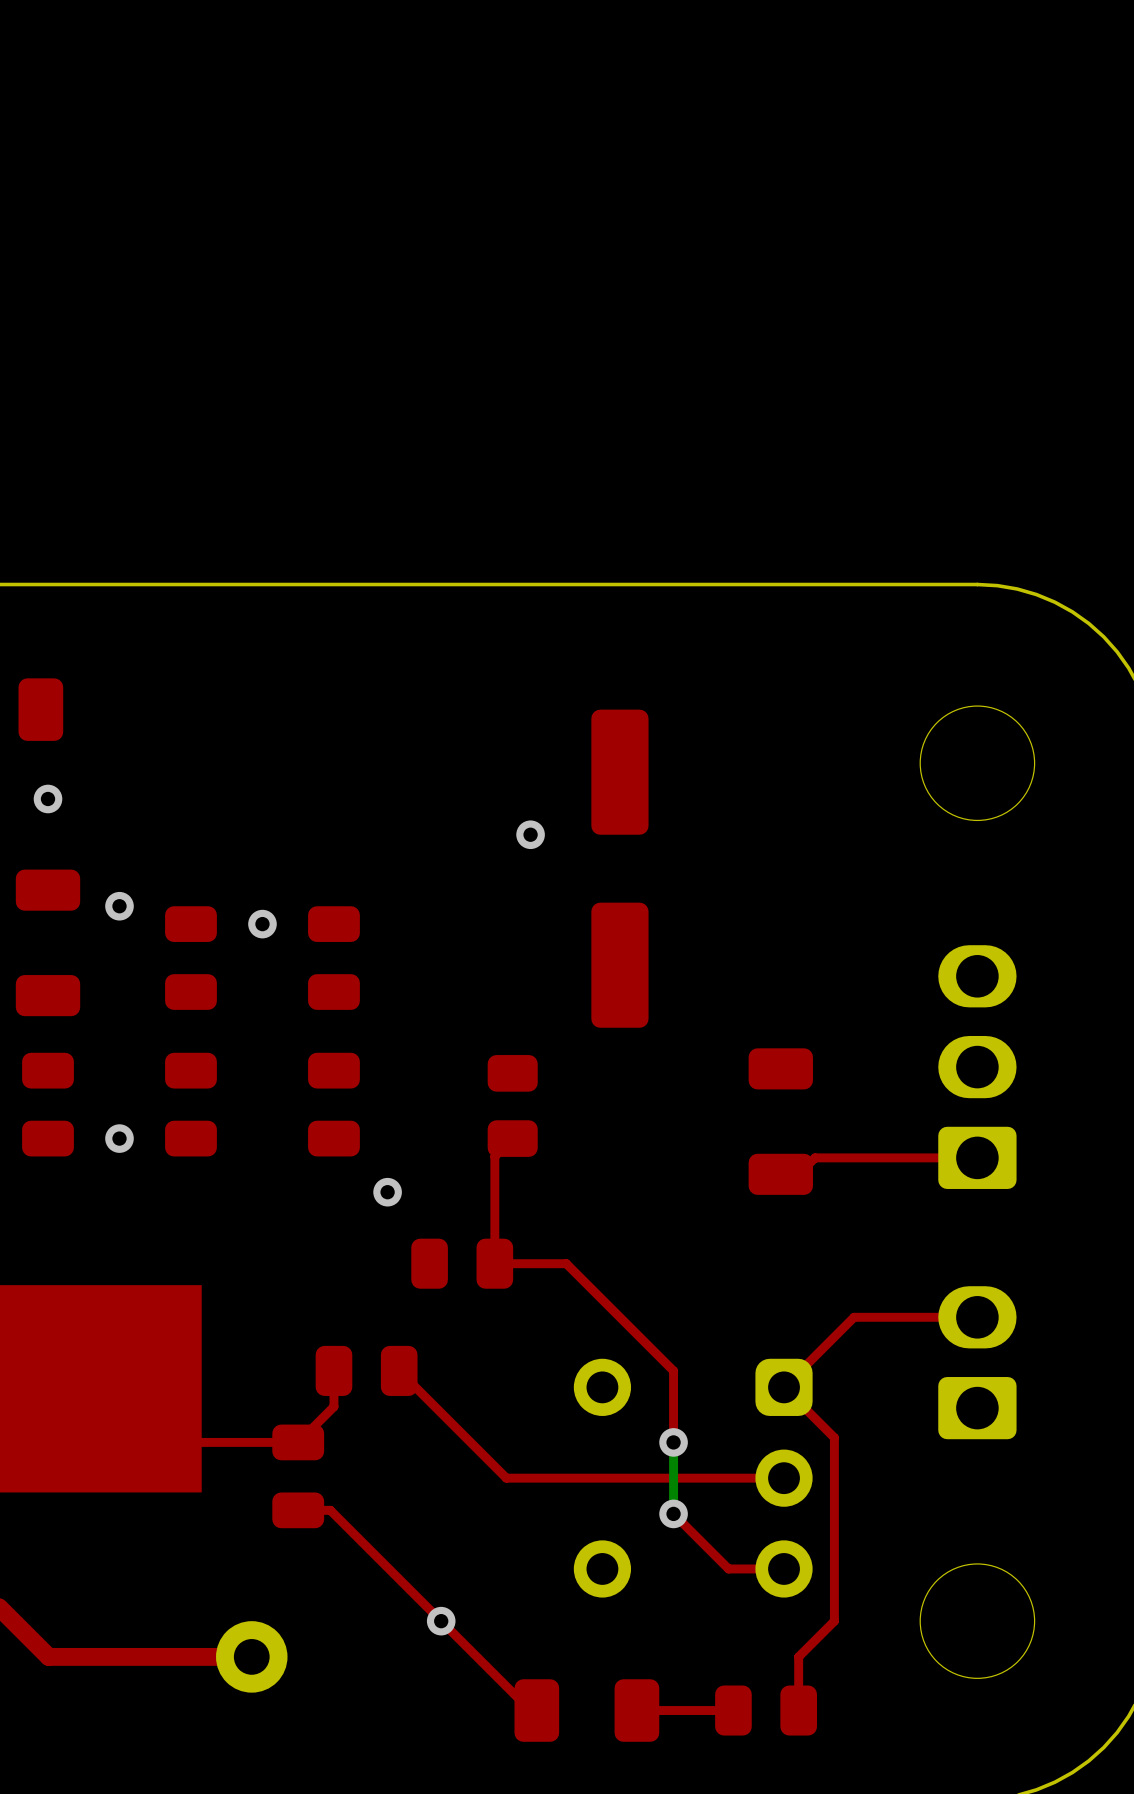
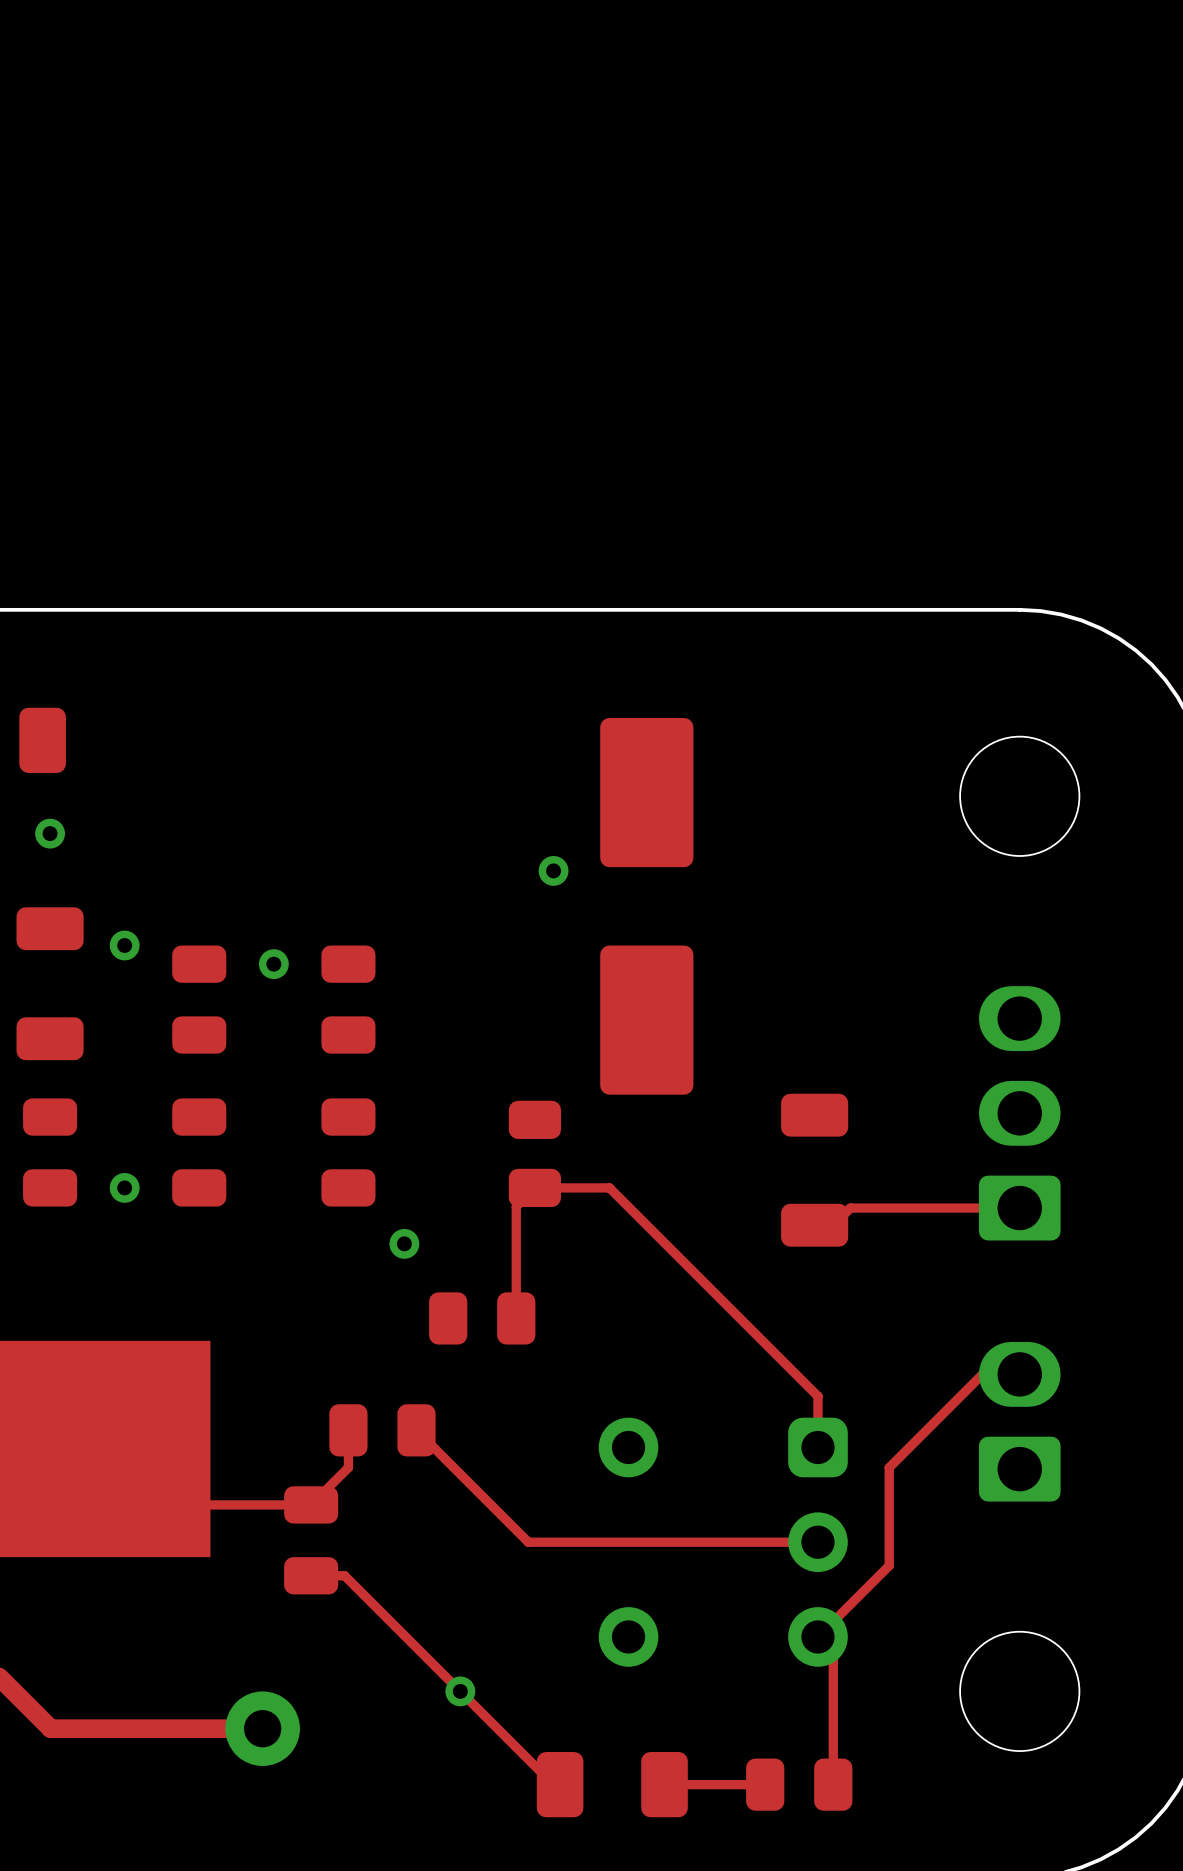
part footprint: [591, 709, 649, 1028] -> [600, 718, 694, 1095]
top track: none -> (534, 1187) (609, 1187) (817, 1396) (817, 1447)
top track: (494, 1263) (566, 1263) (673, 1370) (673, 1442) -> none
top track: (941, 1317) (854, 1317) (784, 1387) (834, 1437) (834, 1621) (798, 1656) -> (982, 1374) (889, 1467) (889, 1565) (817, 1636)
bottom track: (673, 1442) (673, 1513) -> none
via: (673, 1442) -> none
top track: (673, 1513) (728, 1568) (784, 1568) -> none
via: (673, 1513) -> none
top track: none -> (833, 1652) (833, 1728)

